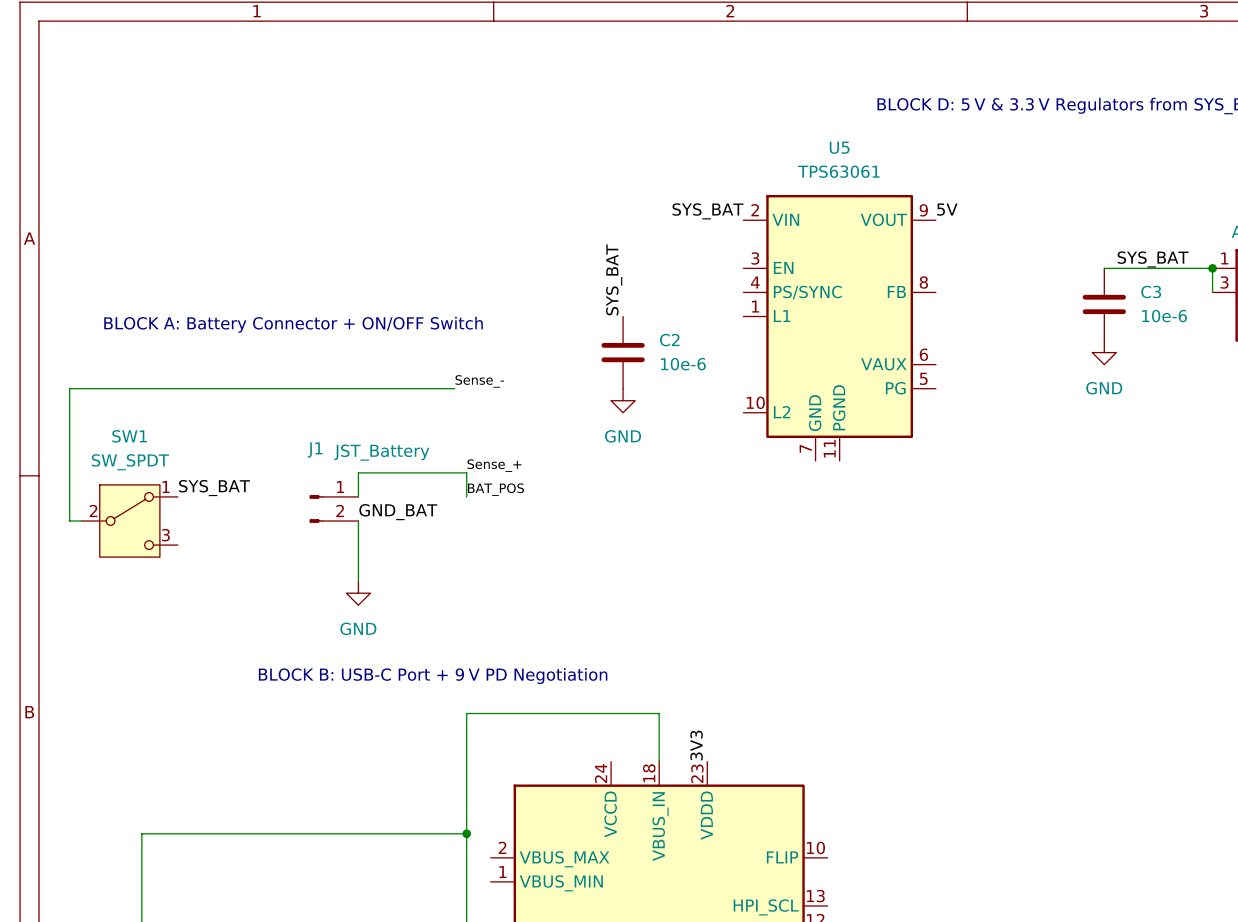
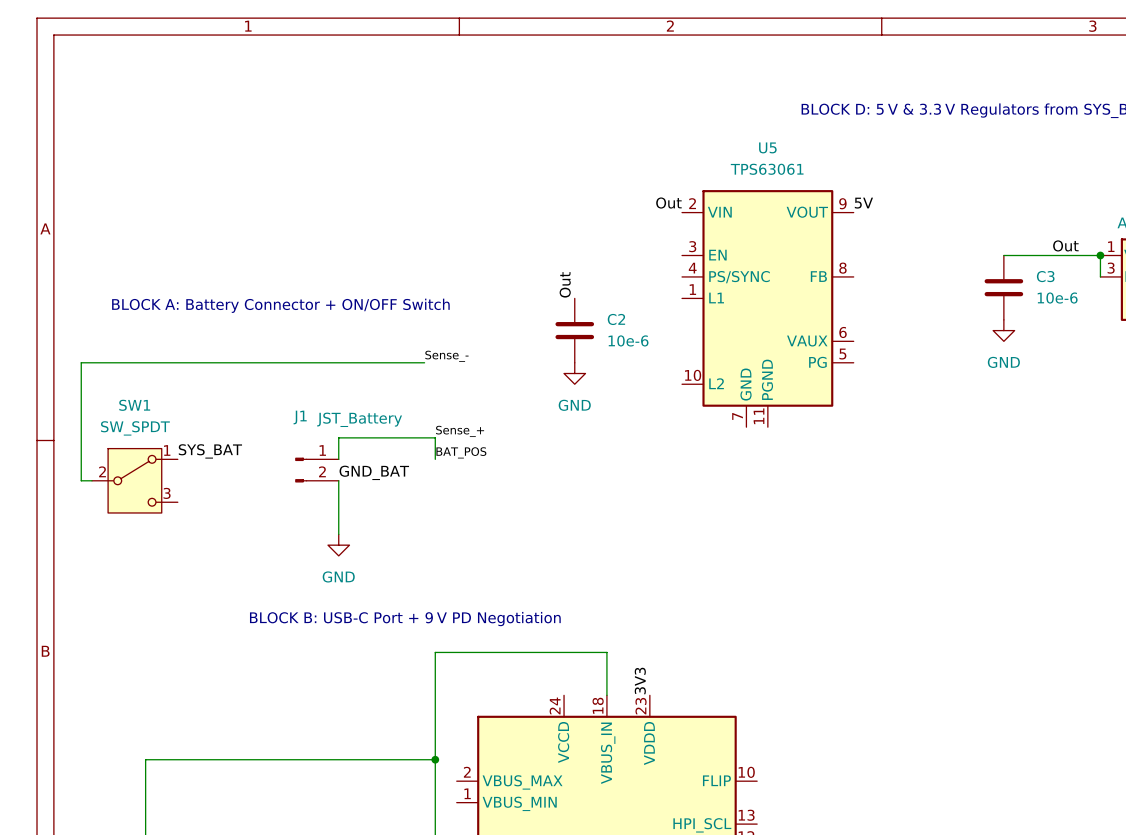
label: SYS_BAT (707, 211) -> Out (668, 203)
label: SYS_BAT (1153, 259) -> Out (1065, 245)
label: SYS_BAT (614, 279) -> Out (565, 284)

